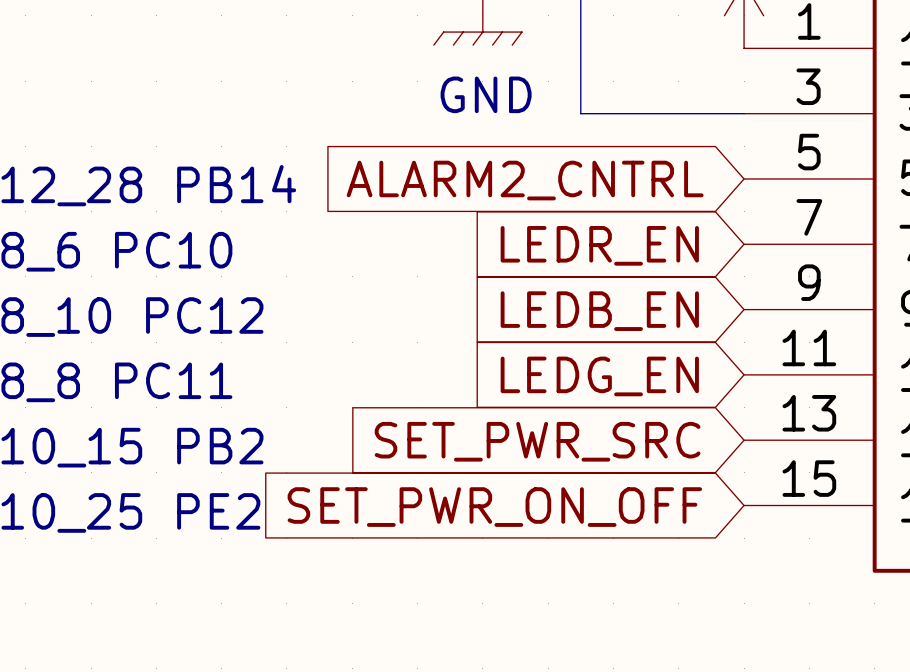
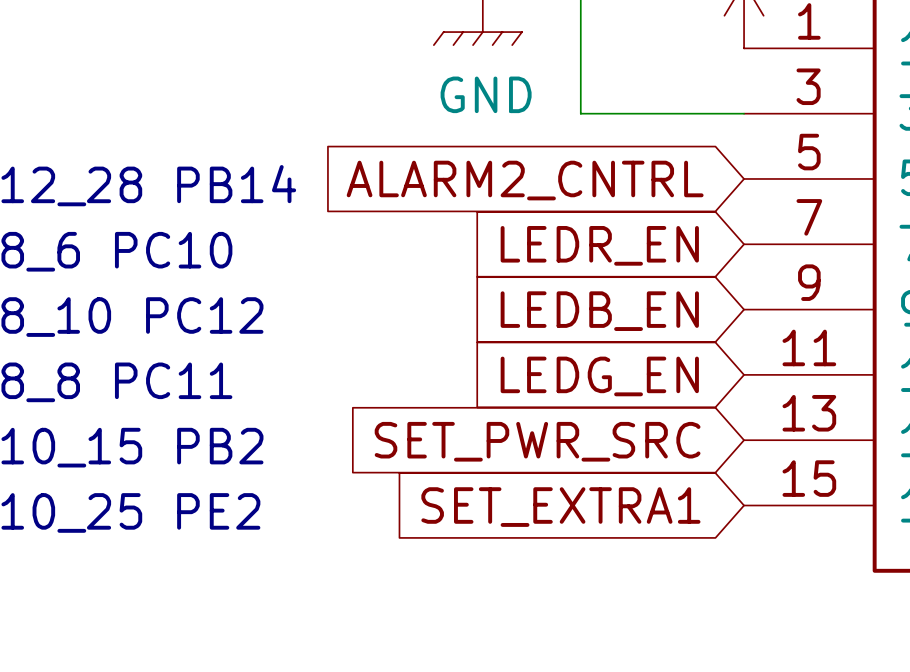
global label: SET_PWR_ON_OFF (494, 507) -> SET_EXTRA1 (560, 507)

